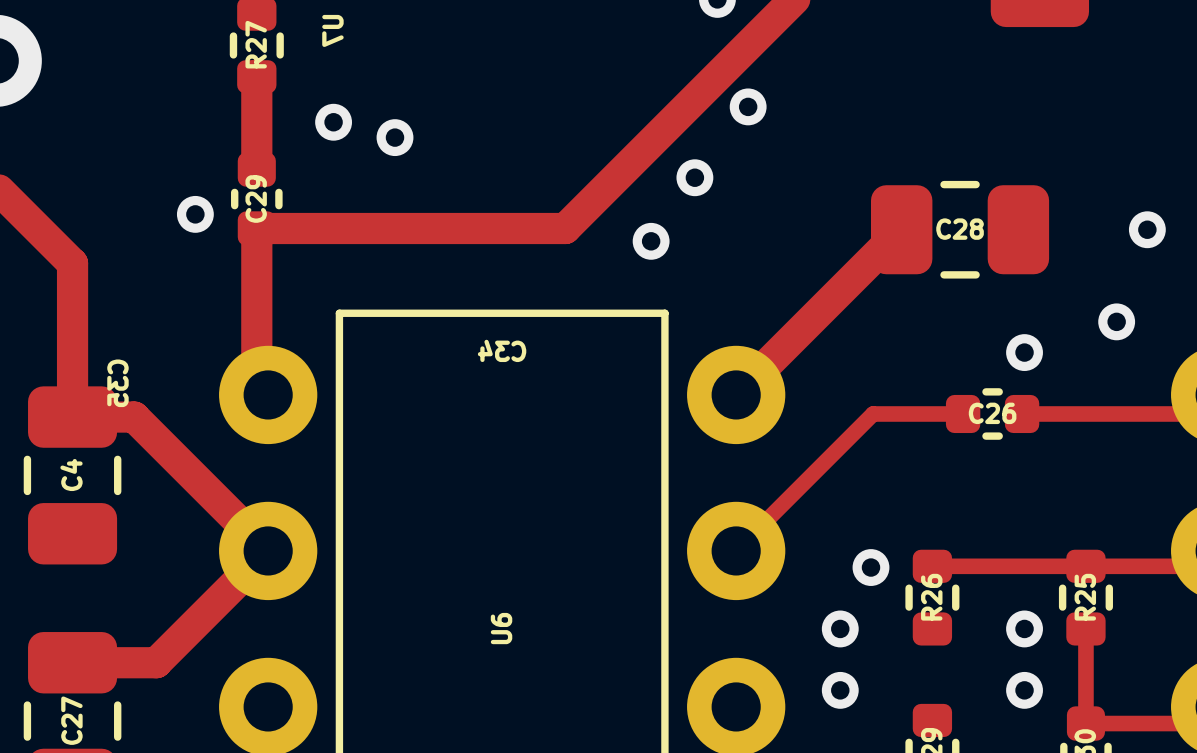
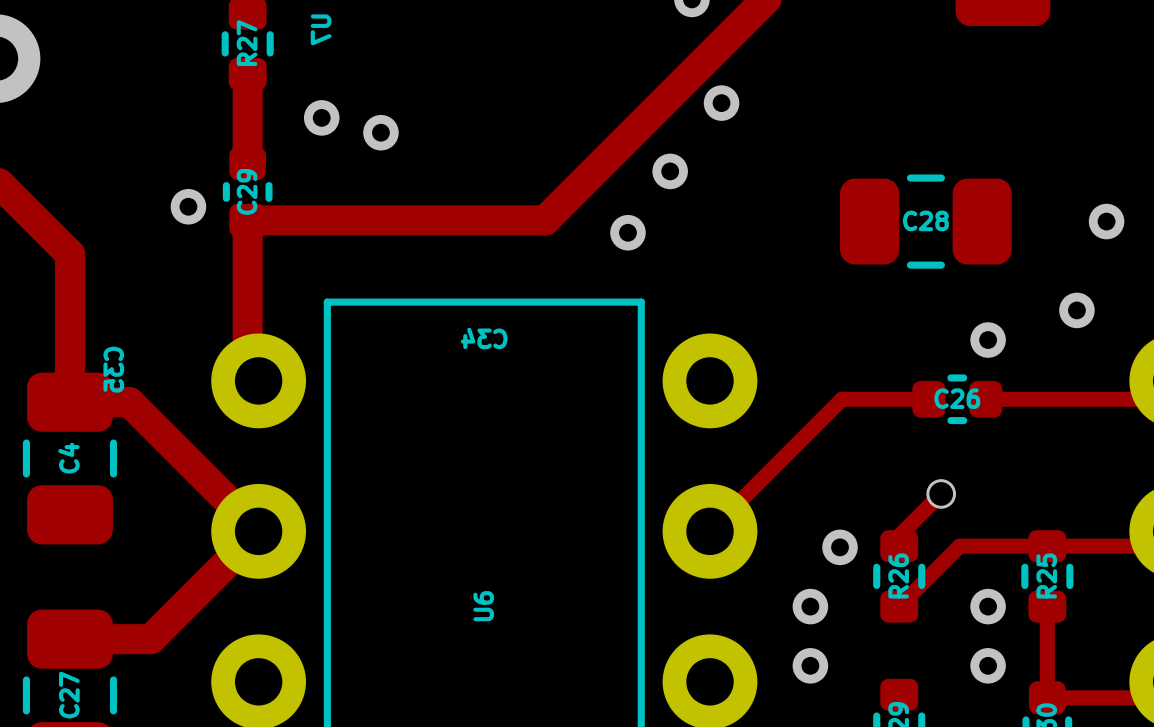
track: (901, 229) (736, 394) -> none
via: none -> (941, 493)
track: (932, 566) (995, 566) -> (899, 546) (899, 535) (941, 493)
track: none -> (959, 546) (899, 606)

